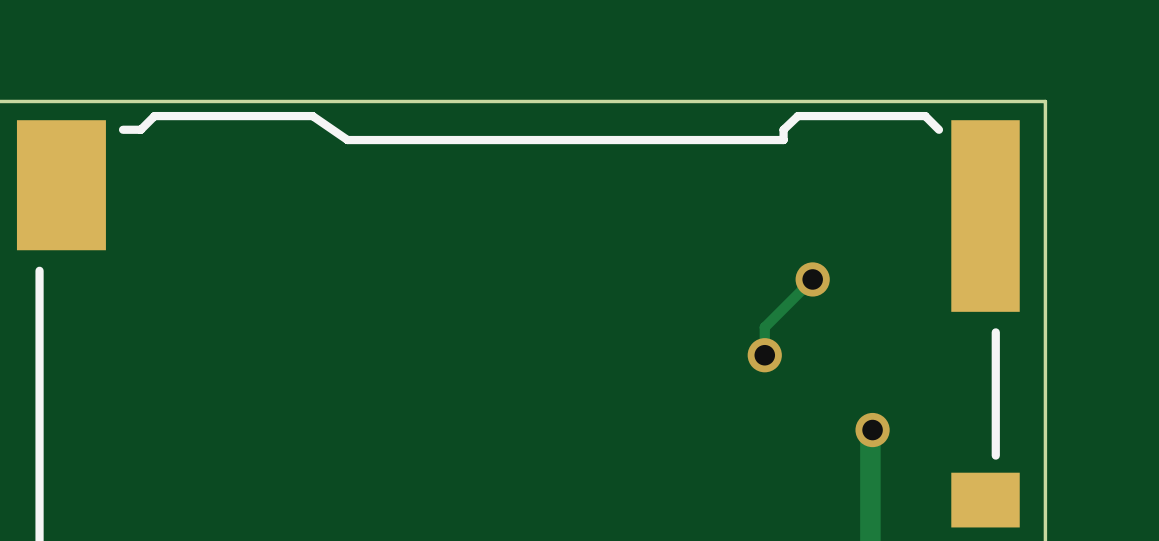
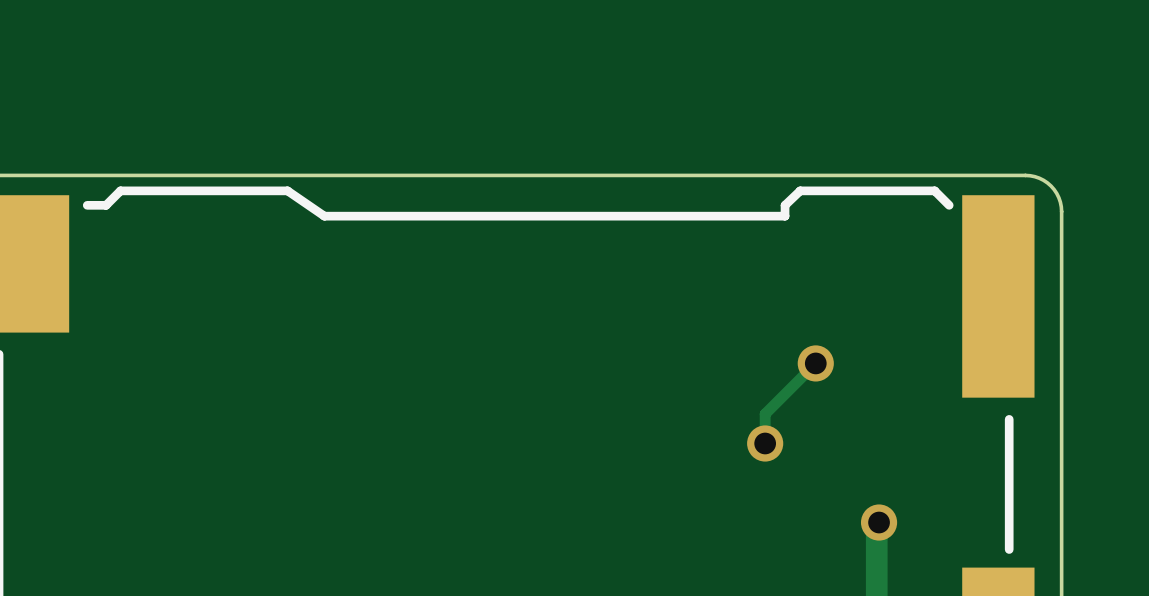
board edge: (1011, 101) (1045, 101) (1045, 135) -> (1025, 175) (1039, 178) (1051, 186) (1058, 197) (1061, 211)

